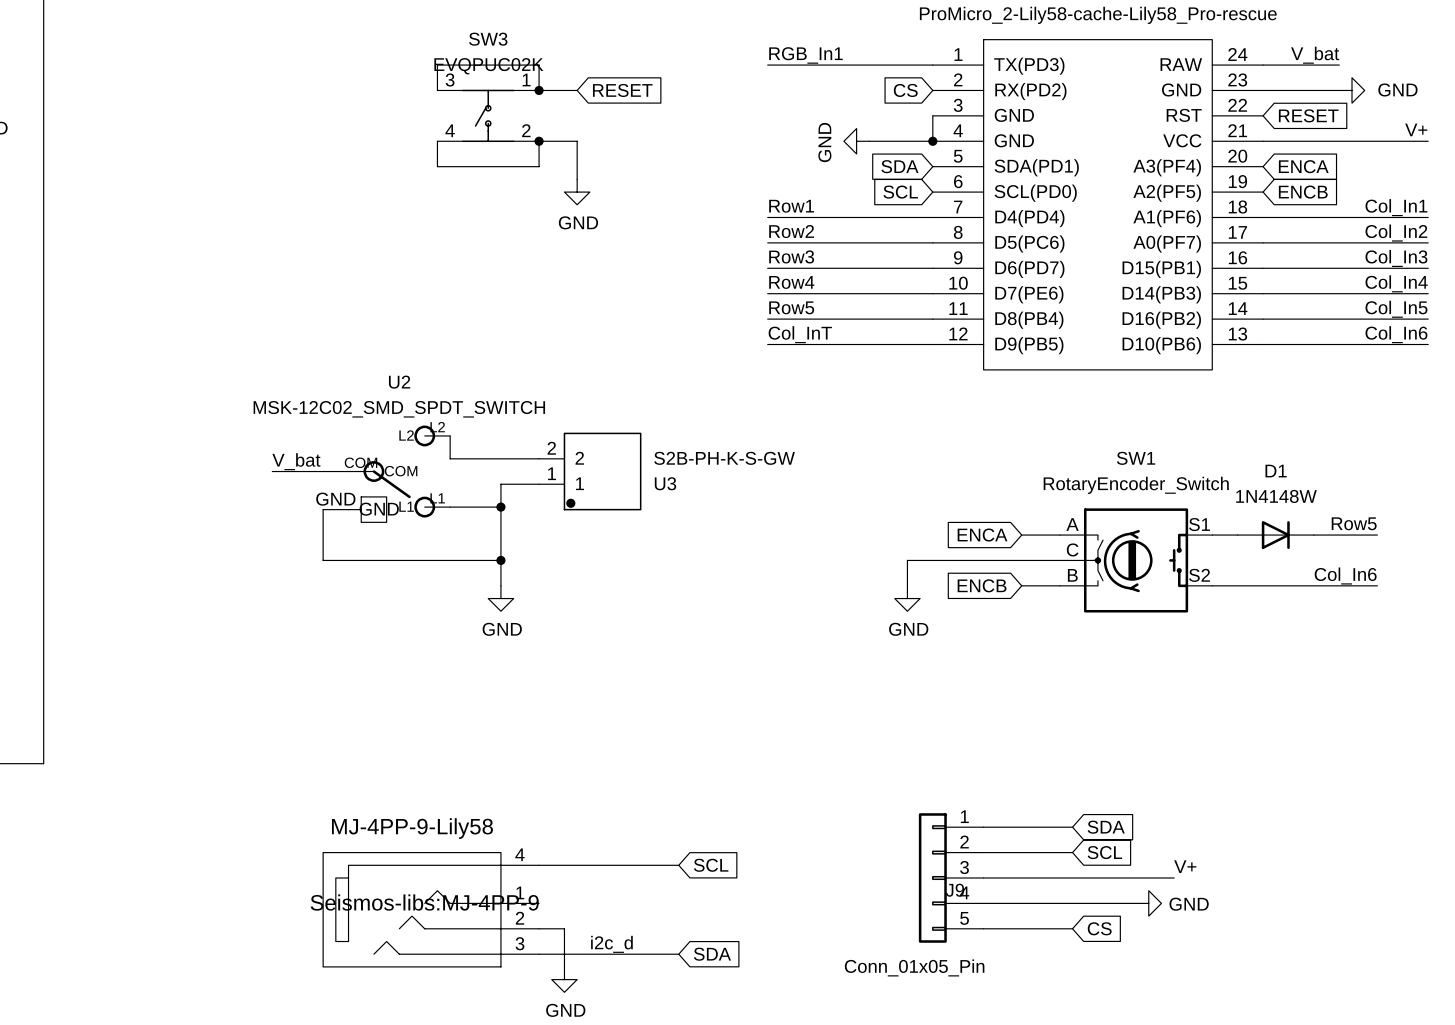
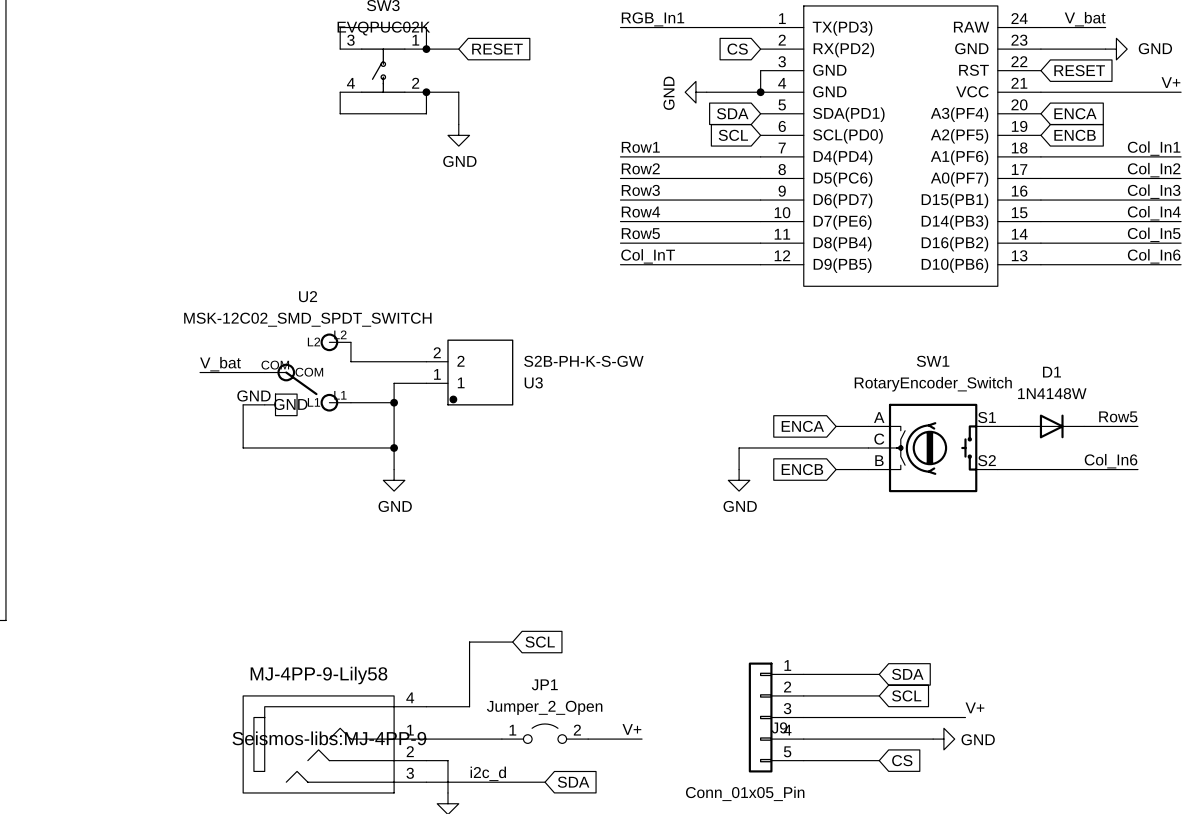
wire: (589, 865) (678, 865) -> (469, 706) (469, 642) (512, 642)
global label position: SCL (711, 865) -> SCL (540, 642)
label: none -> V+ (631, 729)
JP1: none -> Jumper_2_Open (545, 733)
wire: none -> (426, 739) (501, 739)
wire: none -> (588, 739) (642, 739)

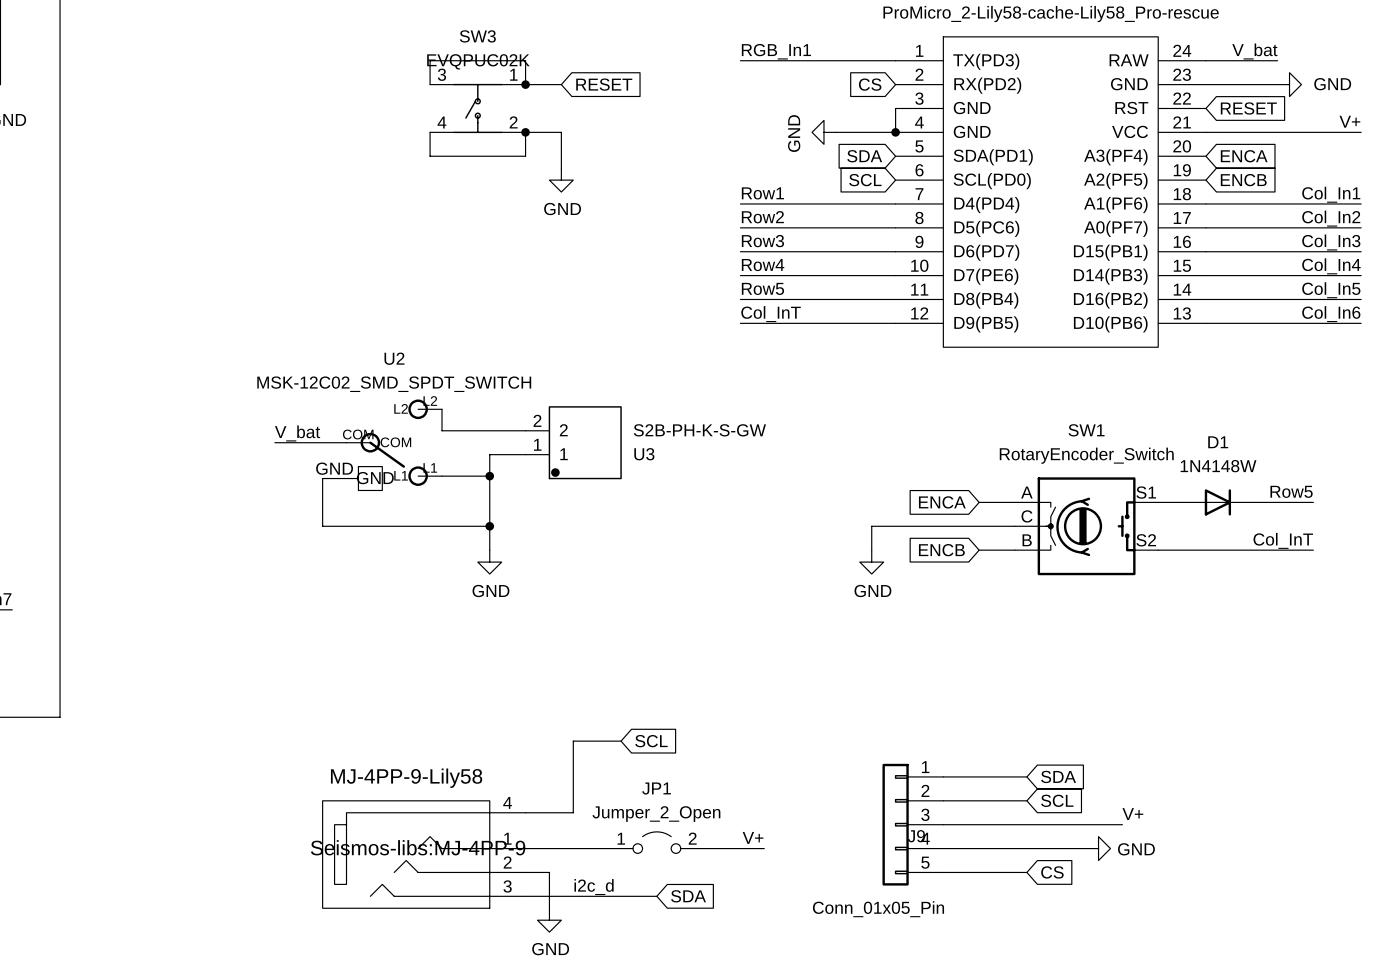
label: Col_In6 (1111, 461) -> Col_InT (1283, 540)

